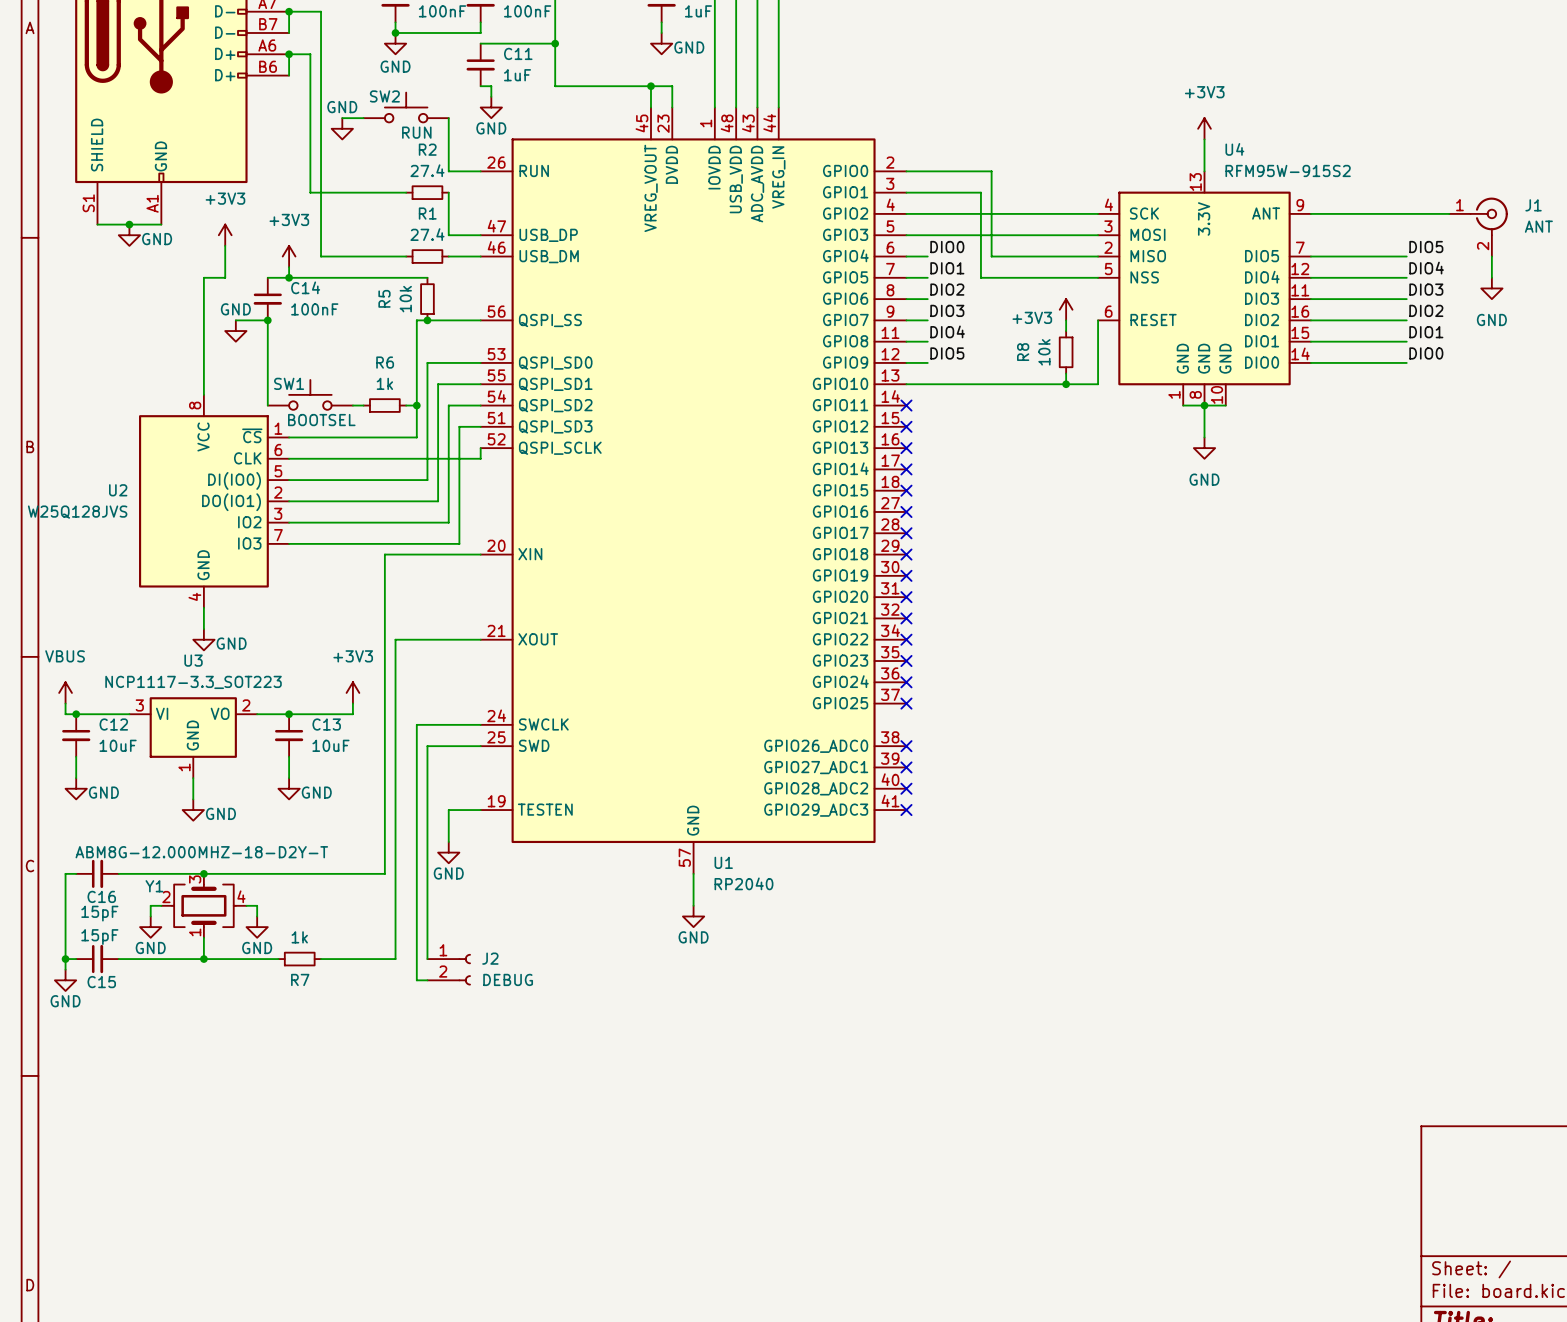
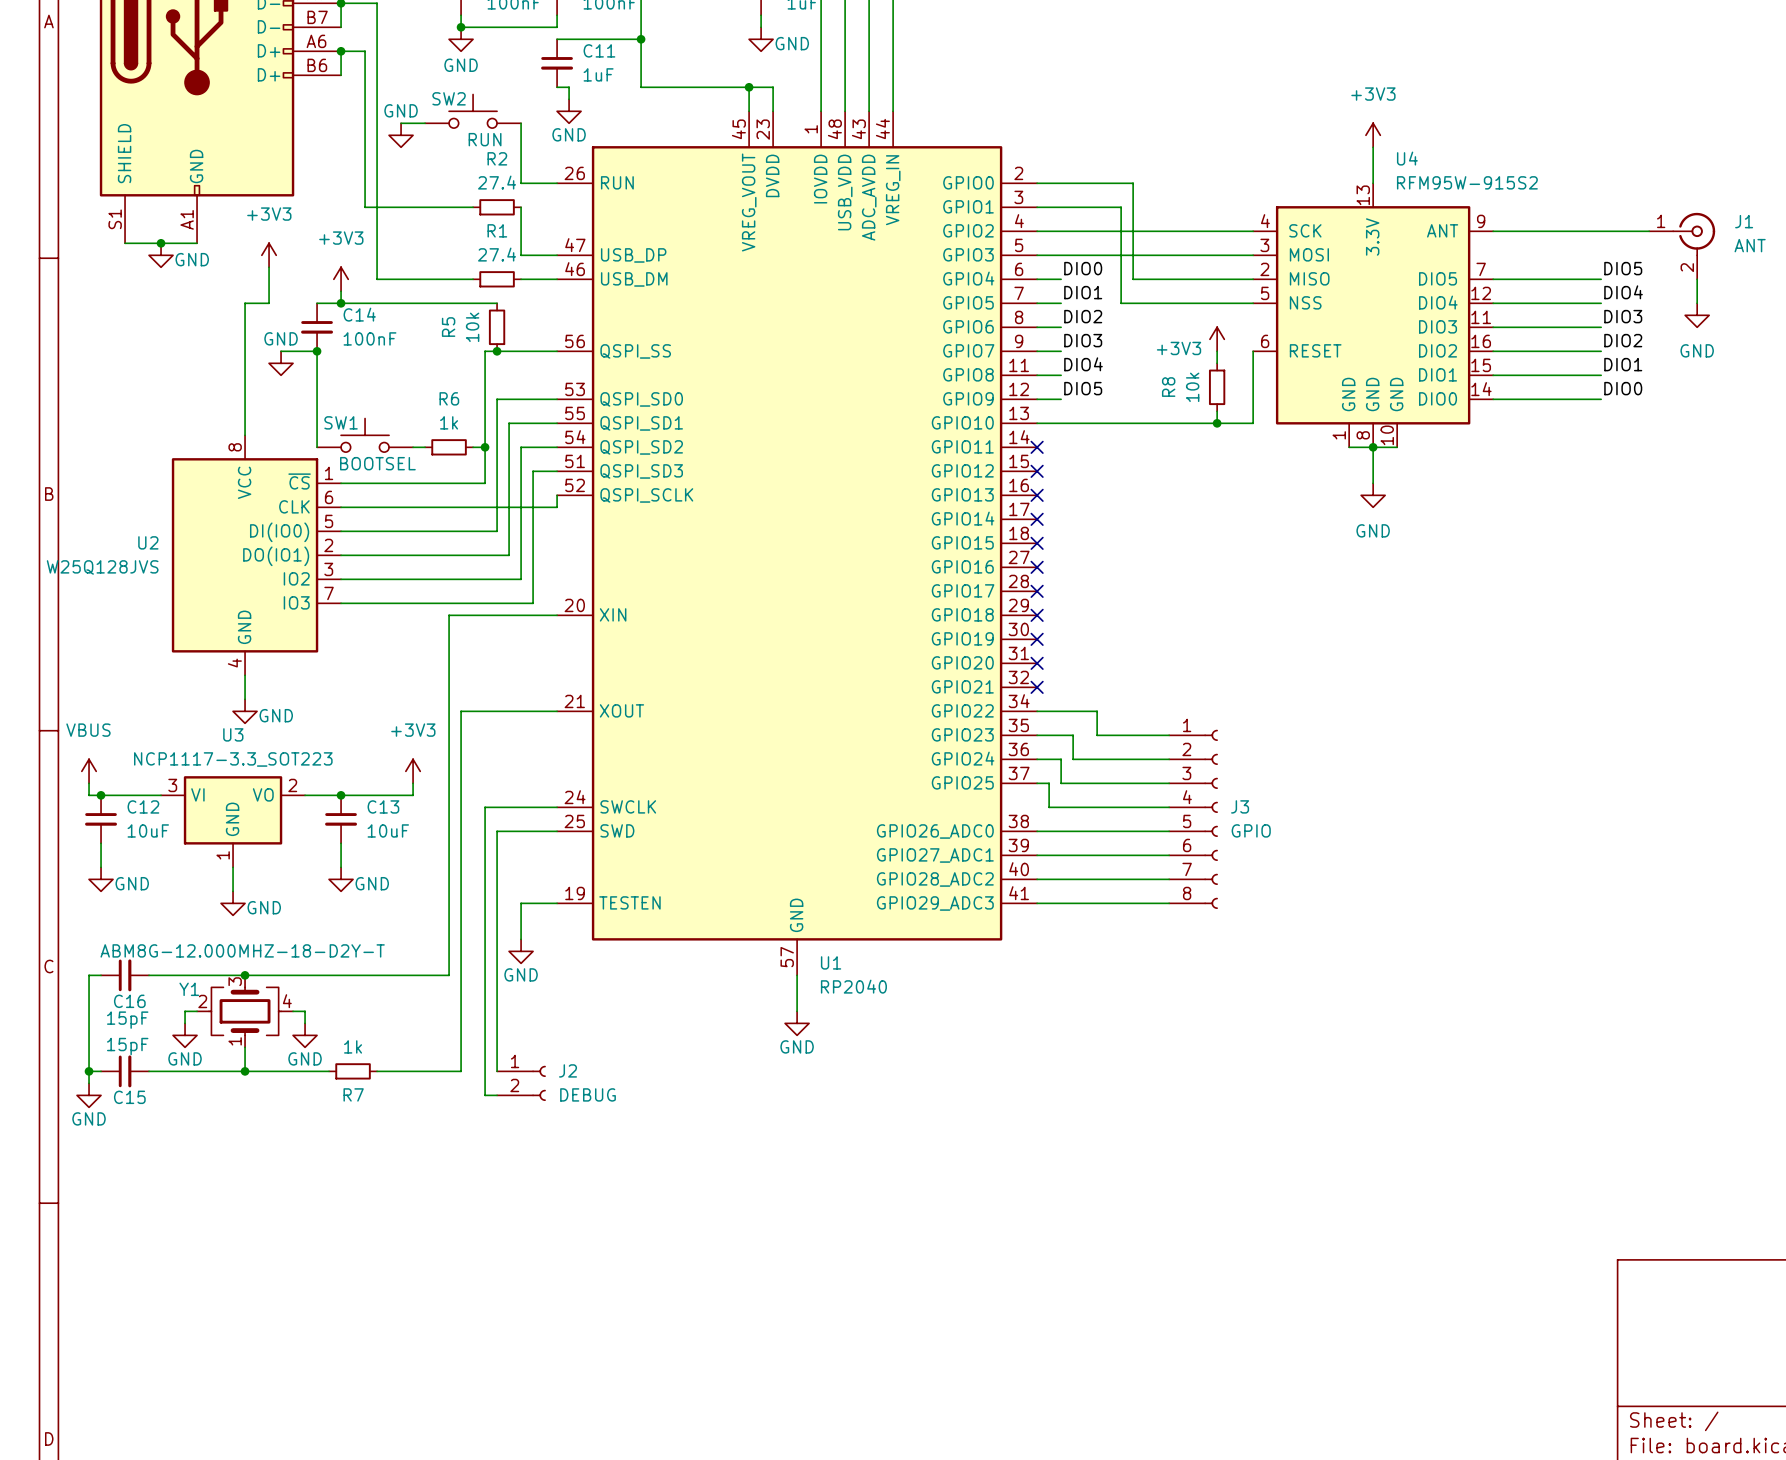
wire: none -> (1037, 711) (1097, 711) (1097, 735) (1169, 735)
no-connect mark: (906, 639) -> none
wire: none -> (1037, 735) (1073, 735) (1073, 759) (1169, 759)
no-connect mark: (906, 661) -> none
wire: none -> (1037, 759) (1061, 759) (1061, 783) (1169, 783)
no-connect mark: (906, 682) -> none
wire: none -> (1037, 783) (1049, 783) (1049, 807) (1169, 807)
no-connect mark: (906, 703) -> none
J3: none -> GPIO (1193, 819)
wire: none -> (1037, 831) (1169, 831)
no-connect mark: (906, 746) -> none
wire: none -> (1037, 855) (1169, 855)
no-connect mark: (906, 767) -> none
wire: none -> (1037, 879) (1169, 879)
no-connect mark: (906, 788) -> none
wire: none -> (1037, 903) (1169, 903)
no-connect mark: (906, 810) -> none

